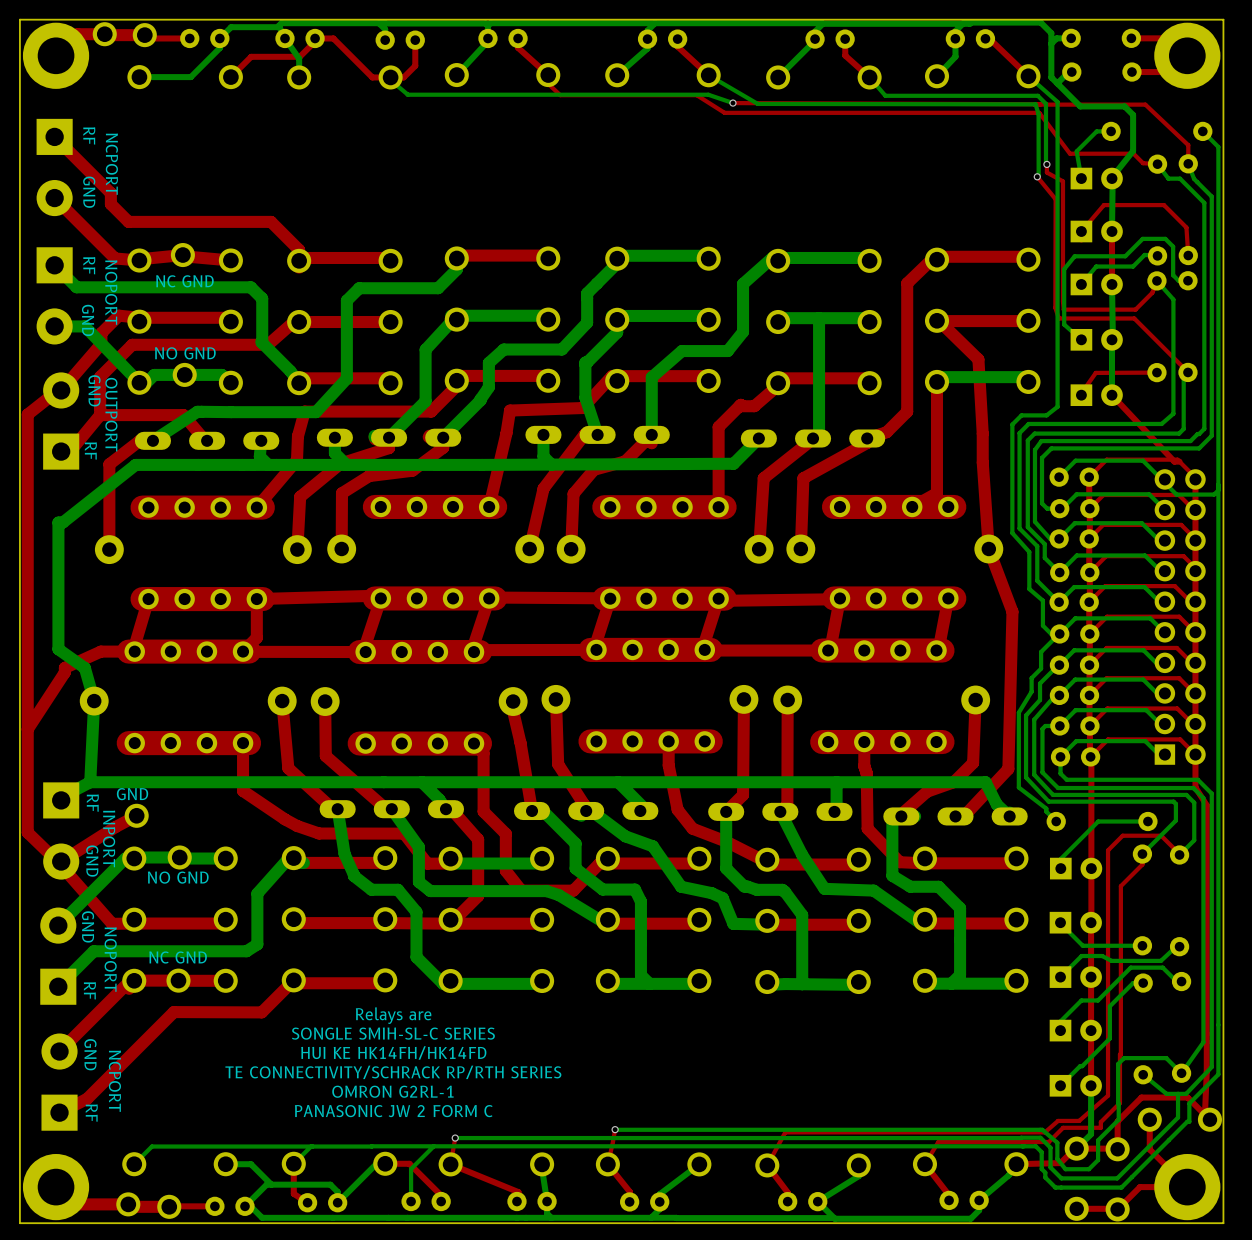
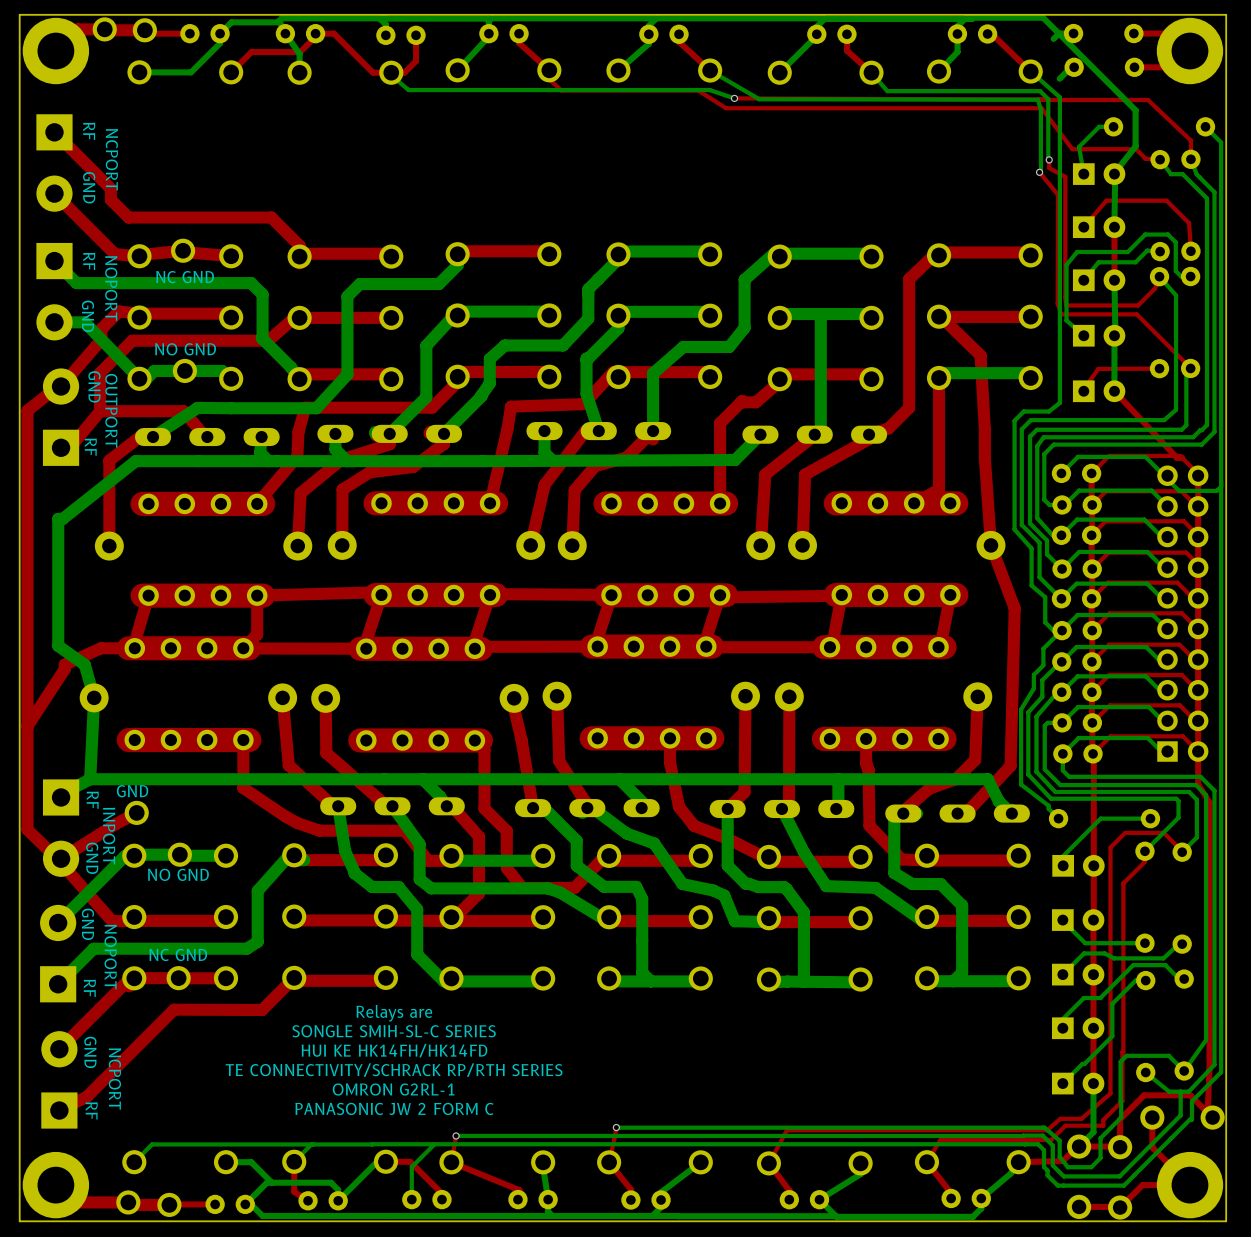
bottom track: (1051, 33) (1051, 77) (1080, 106) (1124, 106) -> (1053, 28) (1127, 101)

